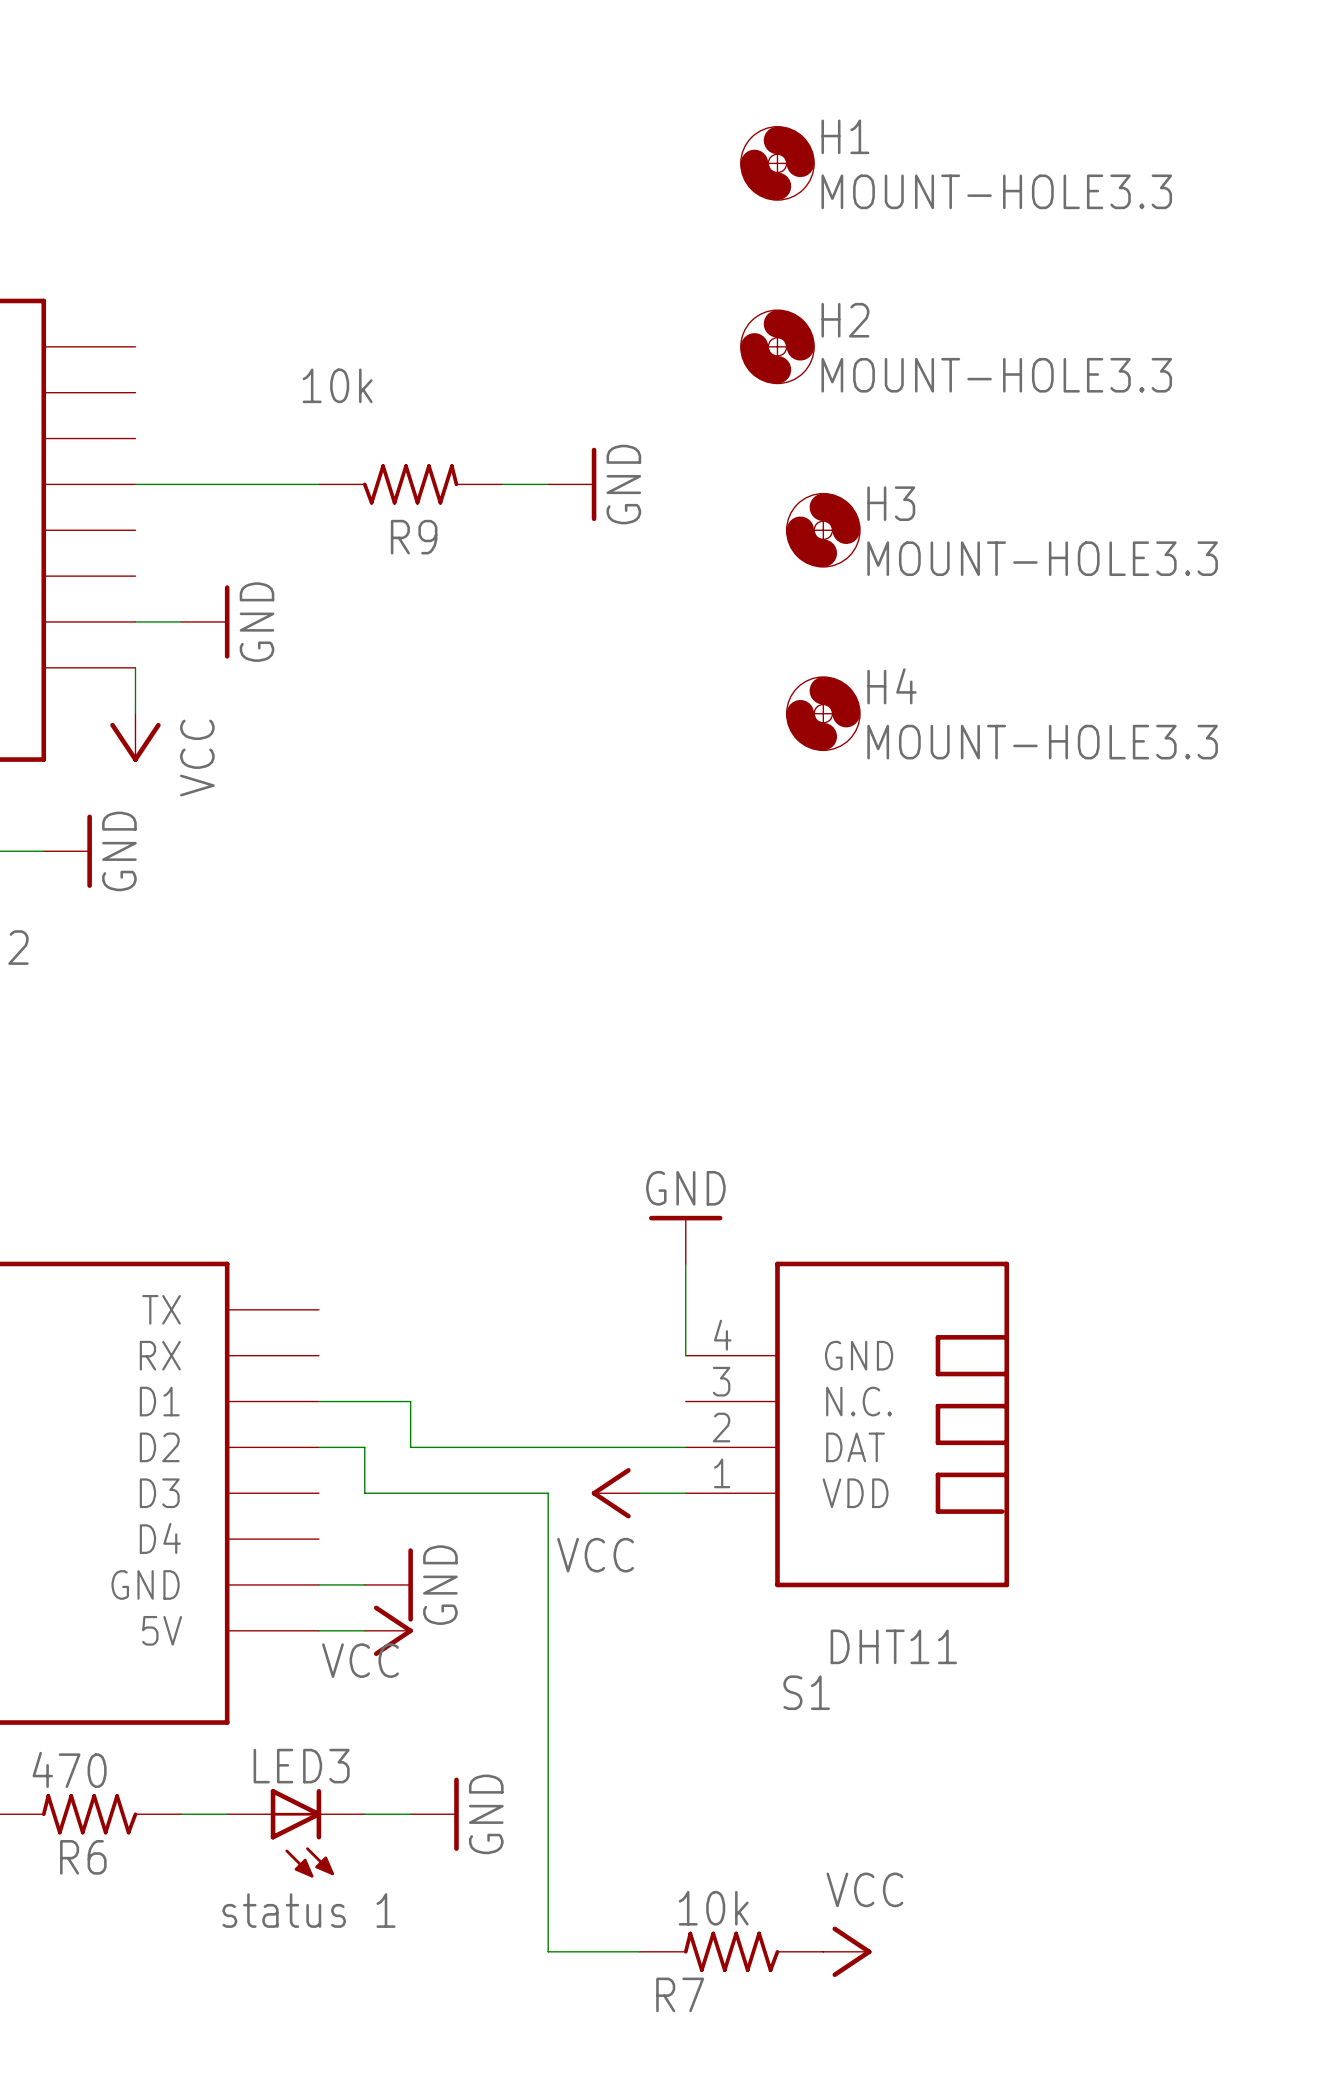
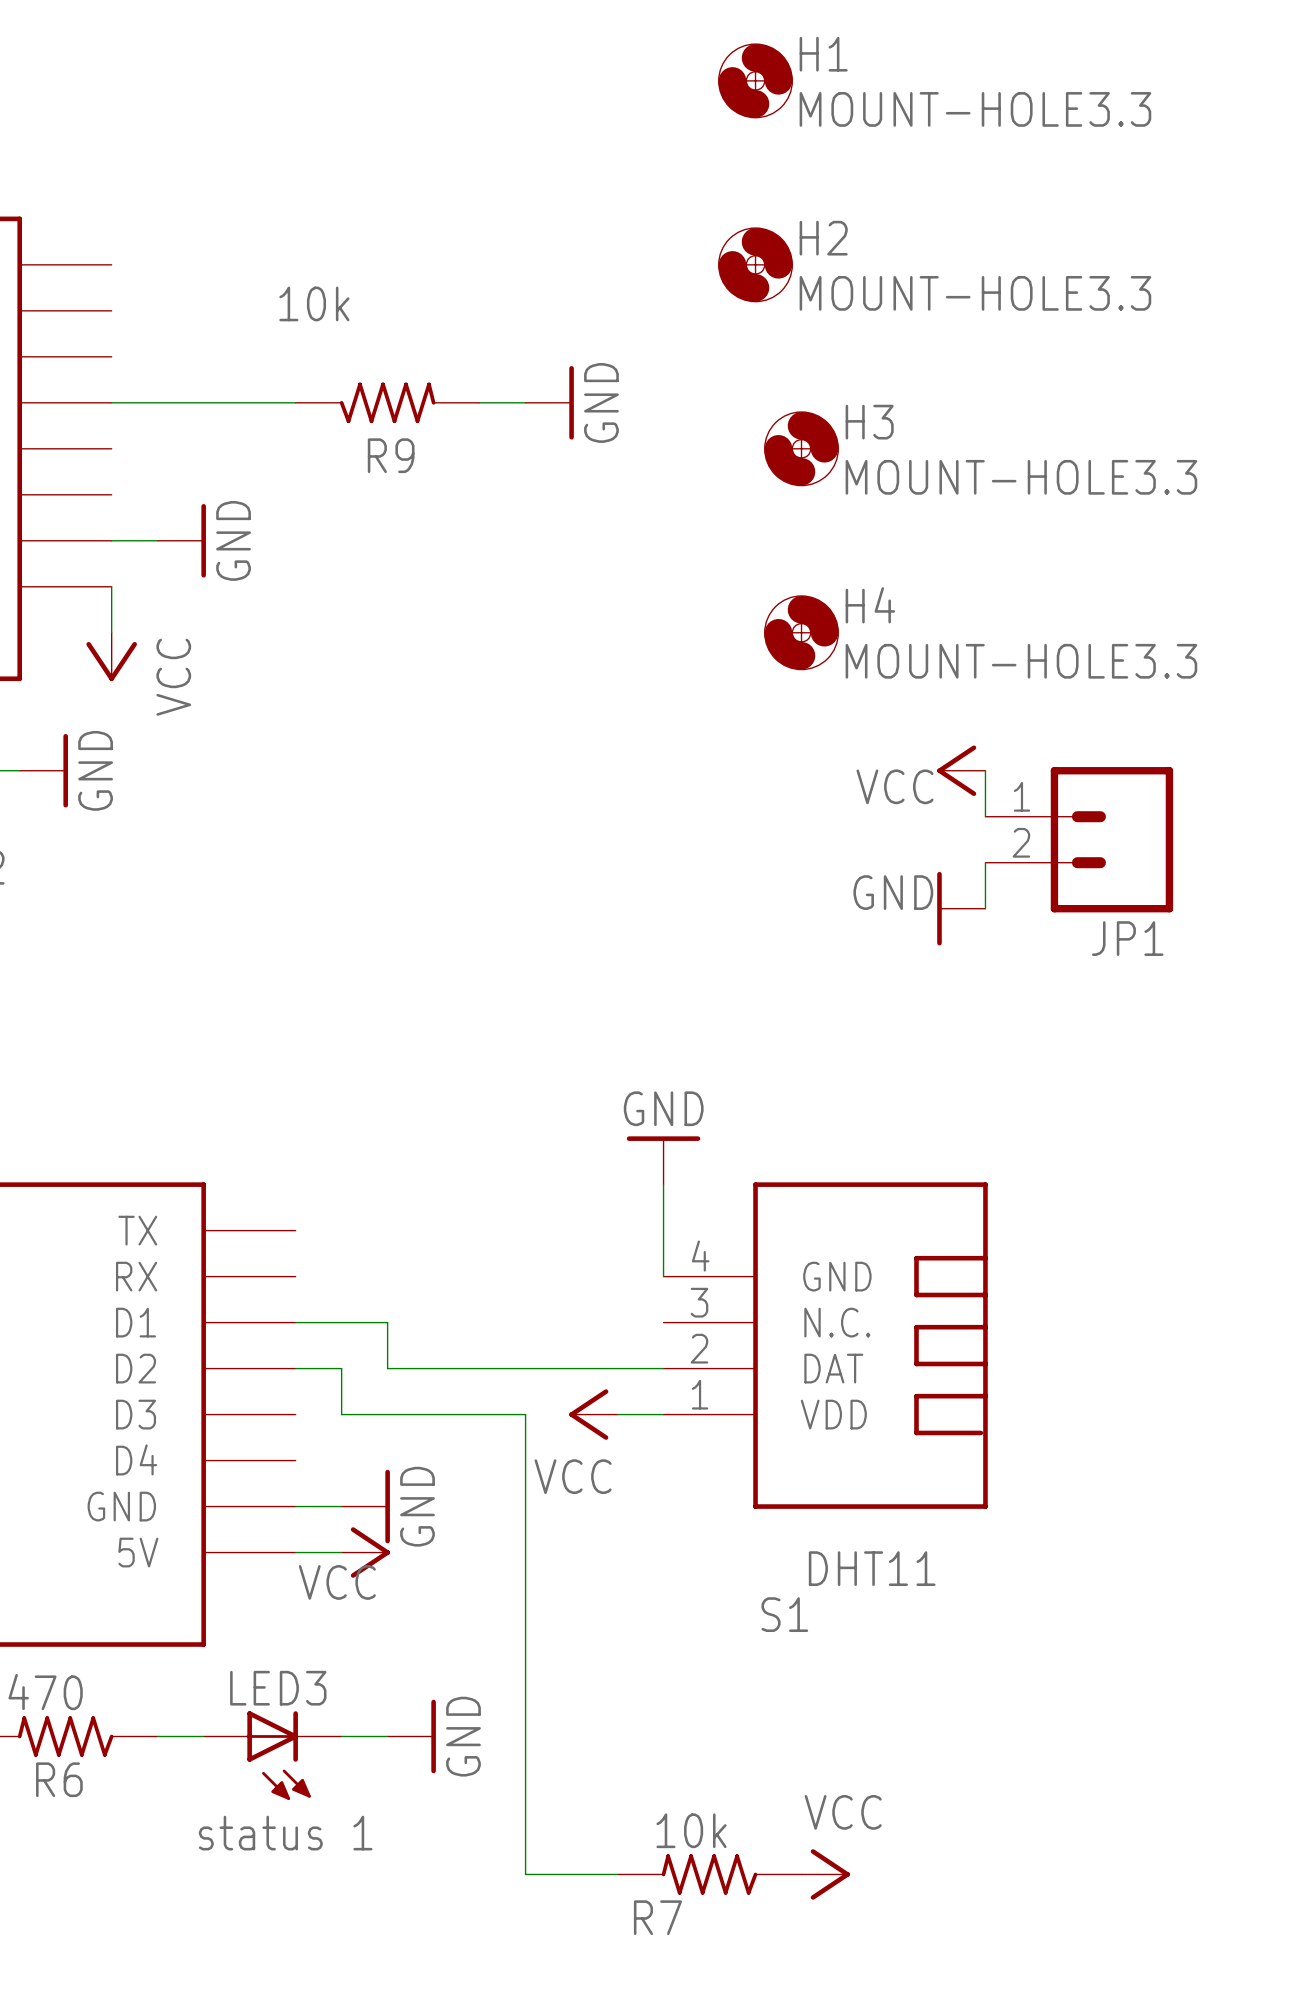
power symbol: none -> VCC (961, 770)
wire: none -> (985, 770) (985, 816)
JP1: none -> (1079, 839)
wire: none -> (985, 862) (985, 908)
power symbol: none -> GND (961, 908)

